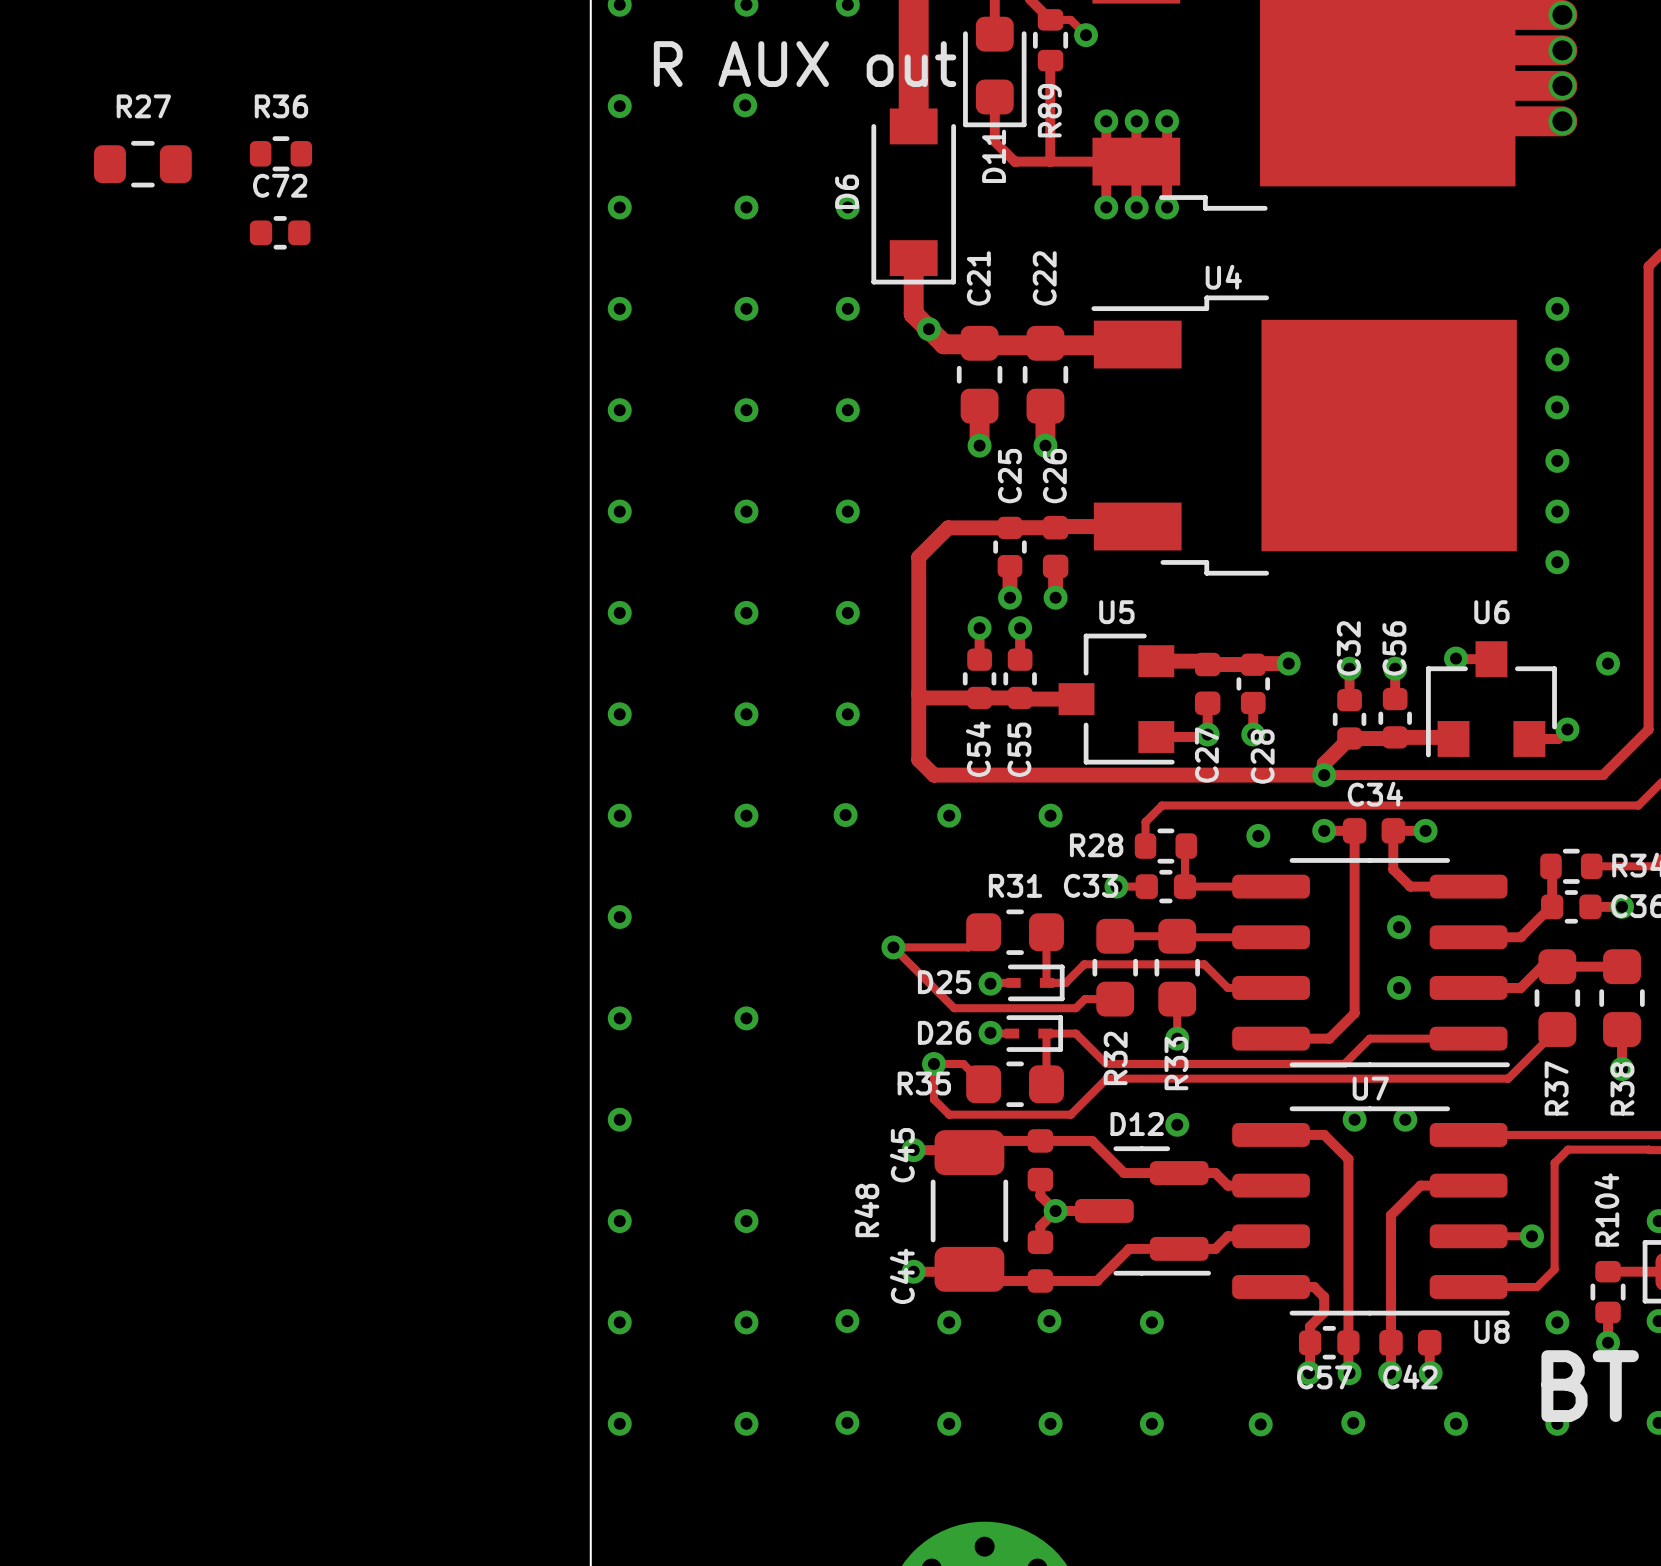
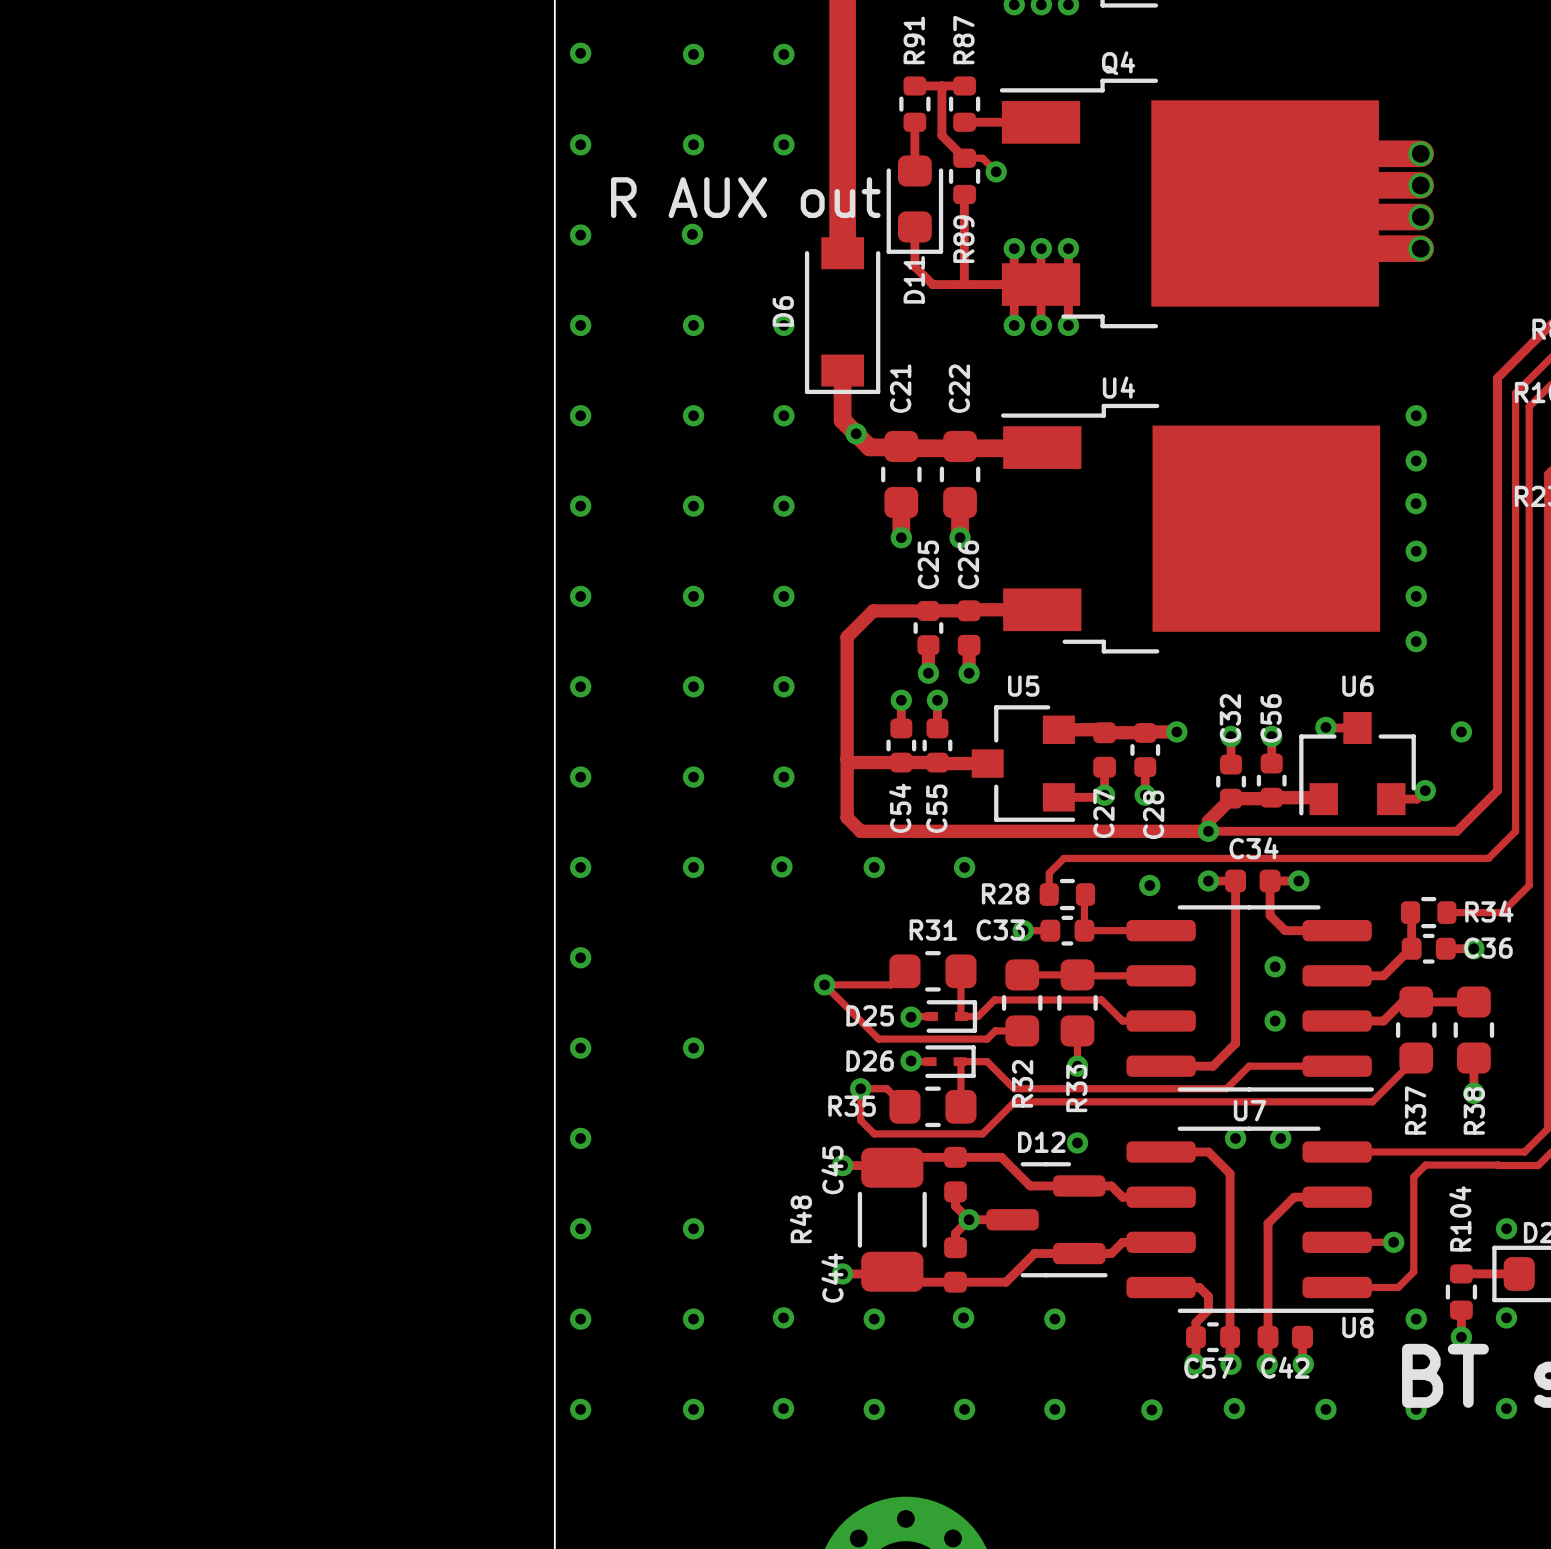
R36: (280, 153) -> none
R27: (142, 164) -> none
C72: (280, 232) -> none

